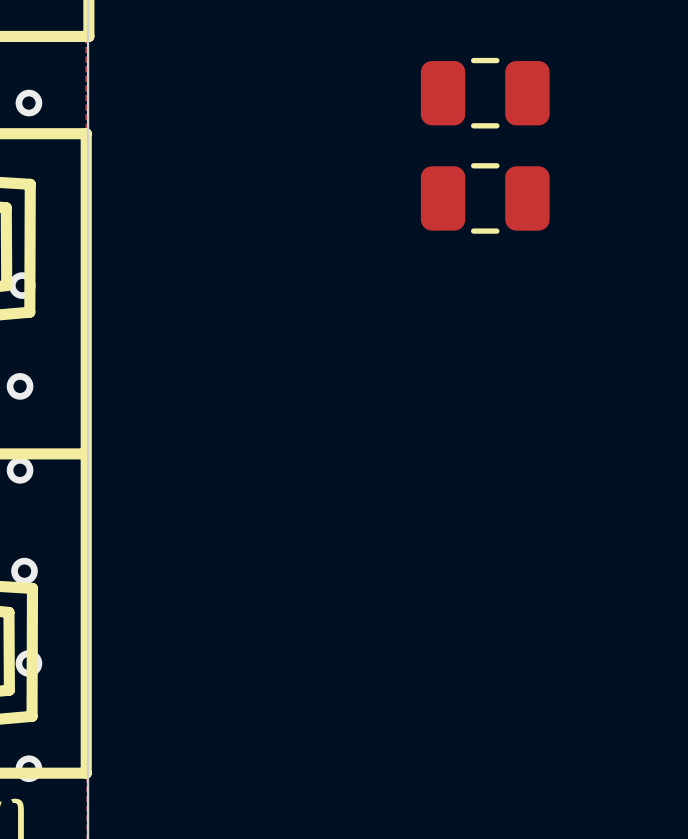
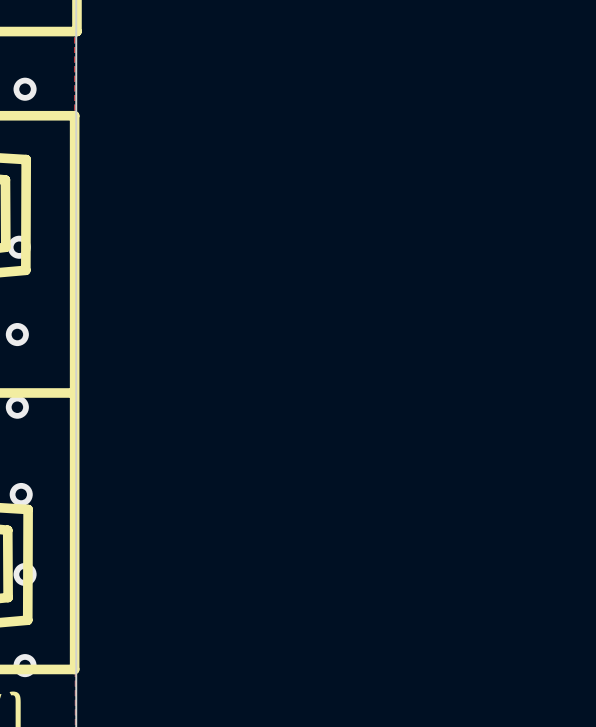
part: (485, 93) -> none
part: (485, 198) -> none

